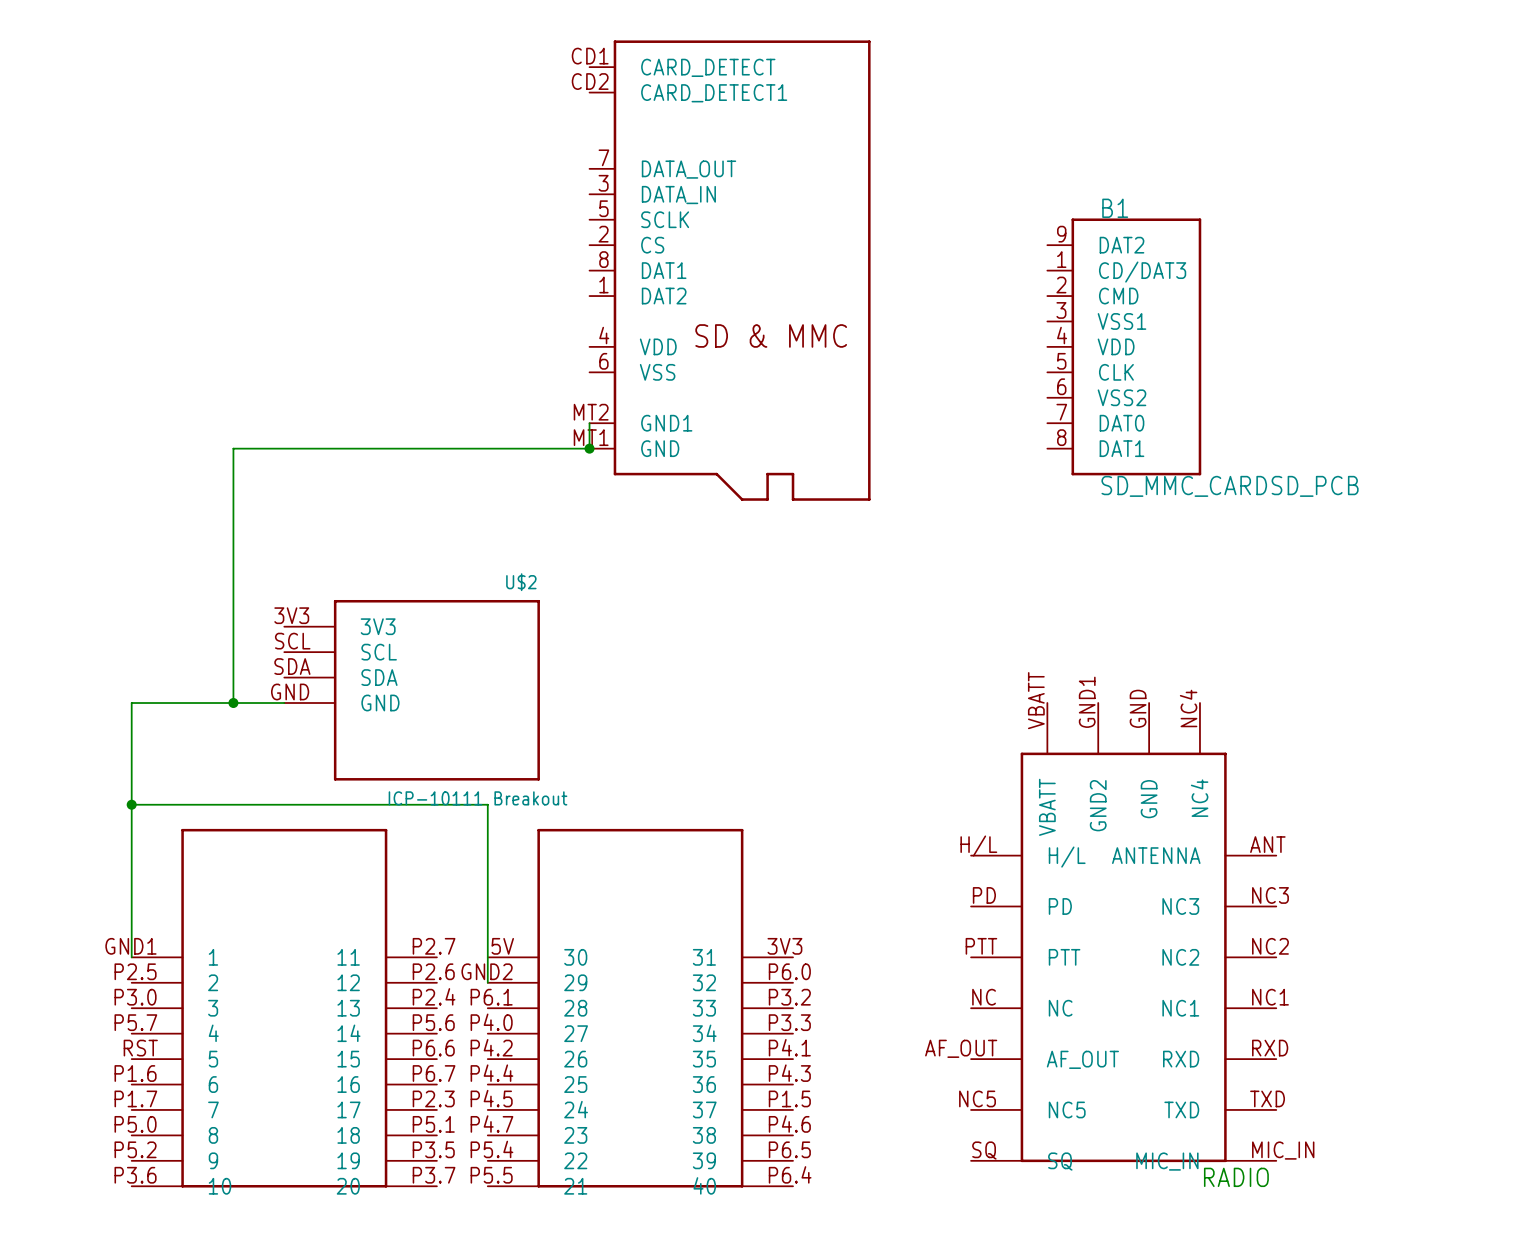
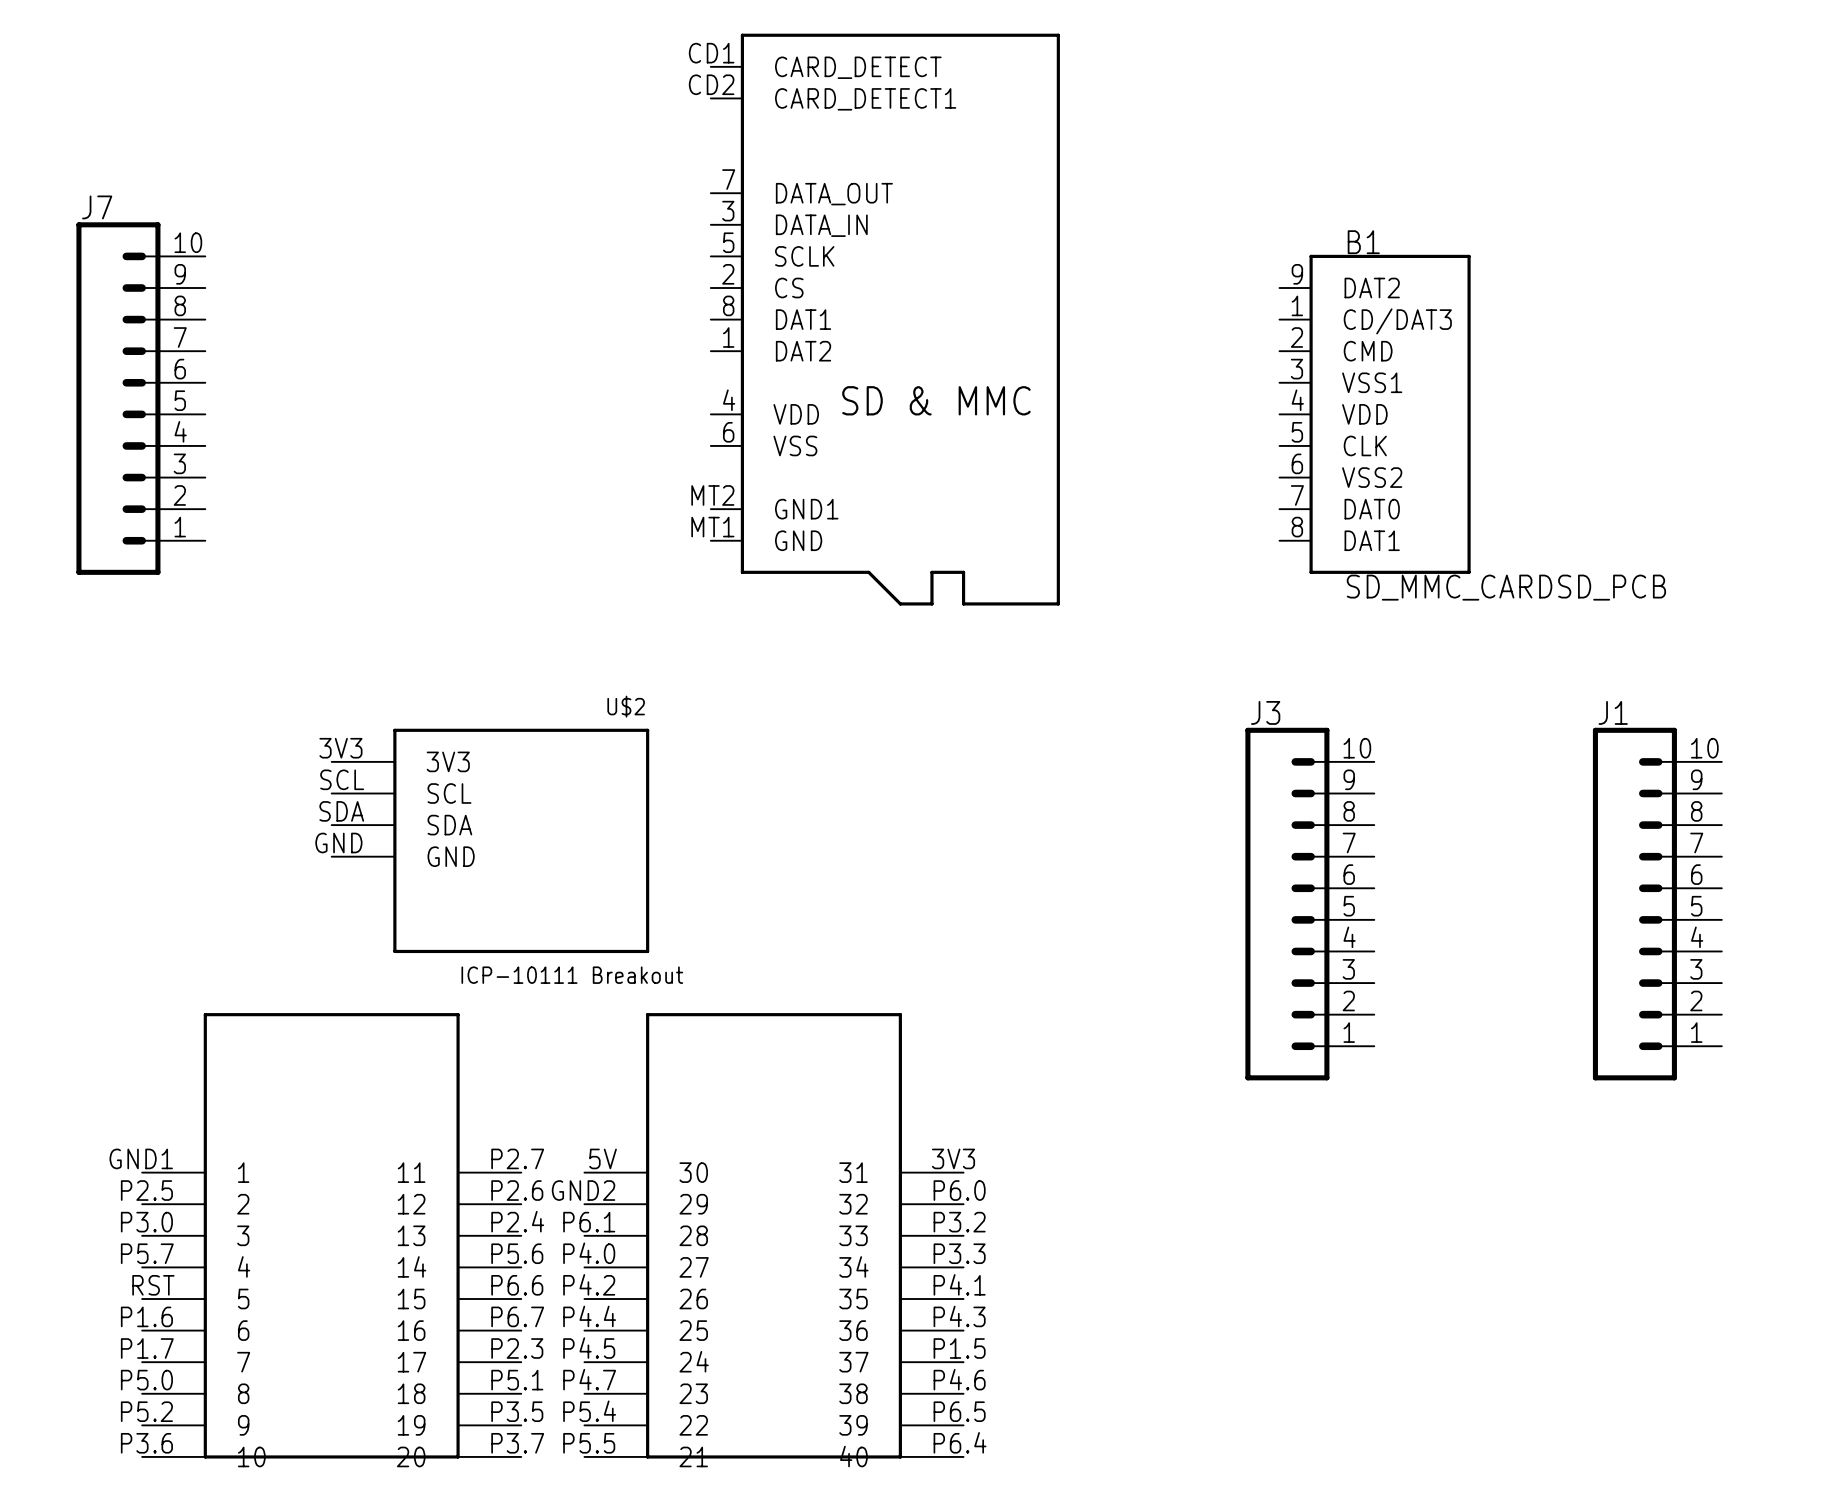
J7: none -> (140, 398)
wire: (589, 423) (589, 448) (233, 448) (233, 703) -> none
junction: (589, 448) -> none
junction: (233, 703) -> none
wire: (284, 703) (131, 703) (131, 957) -> none
J3: none -> (1309, 904)
J1: none -> (1657, 904)
wire: (131, 804) (487, 804) (487, 982) -> none
junction: (131, 804) -> none
part: (1123, 932) -> none
text: RADIO (1236, 1177) -> none

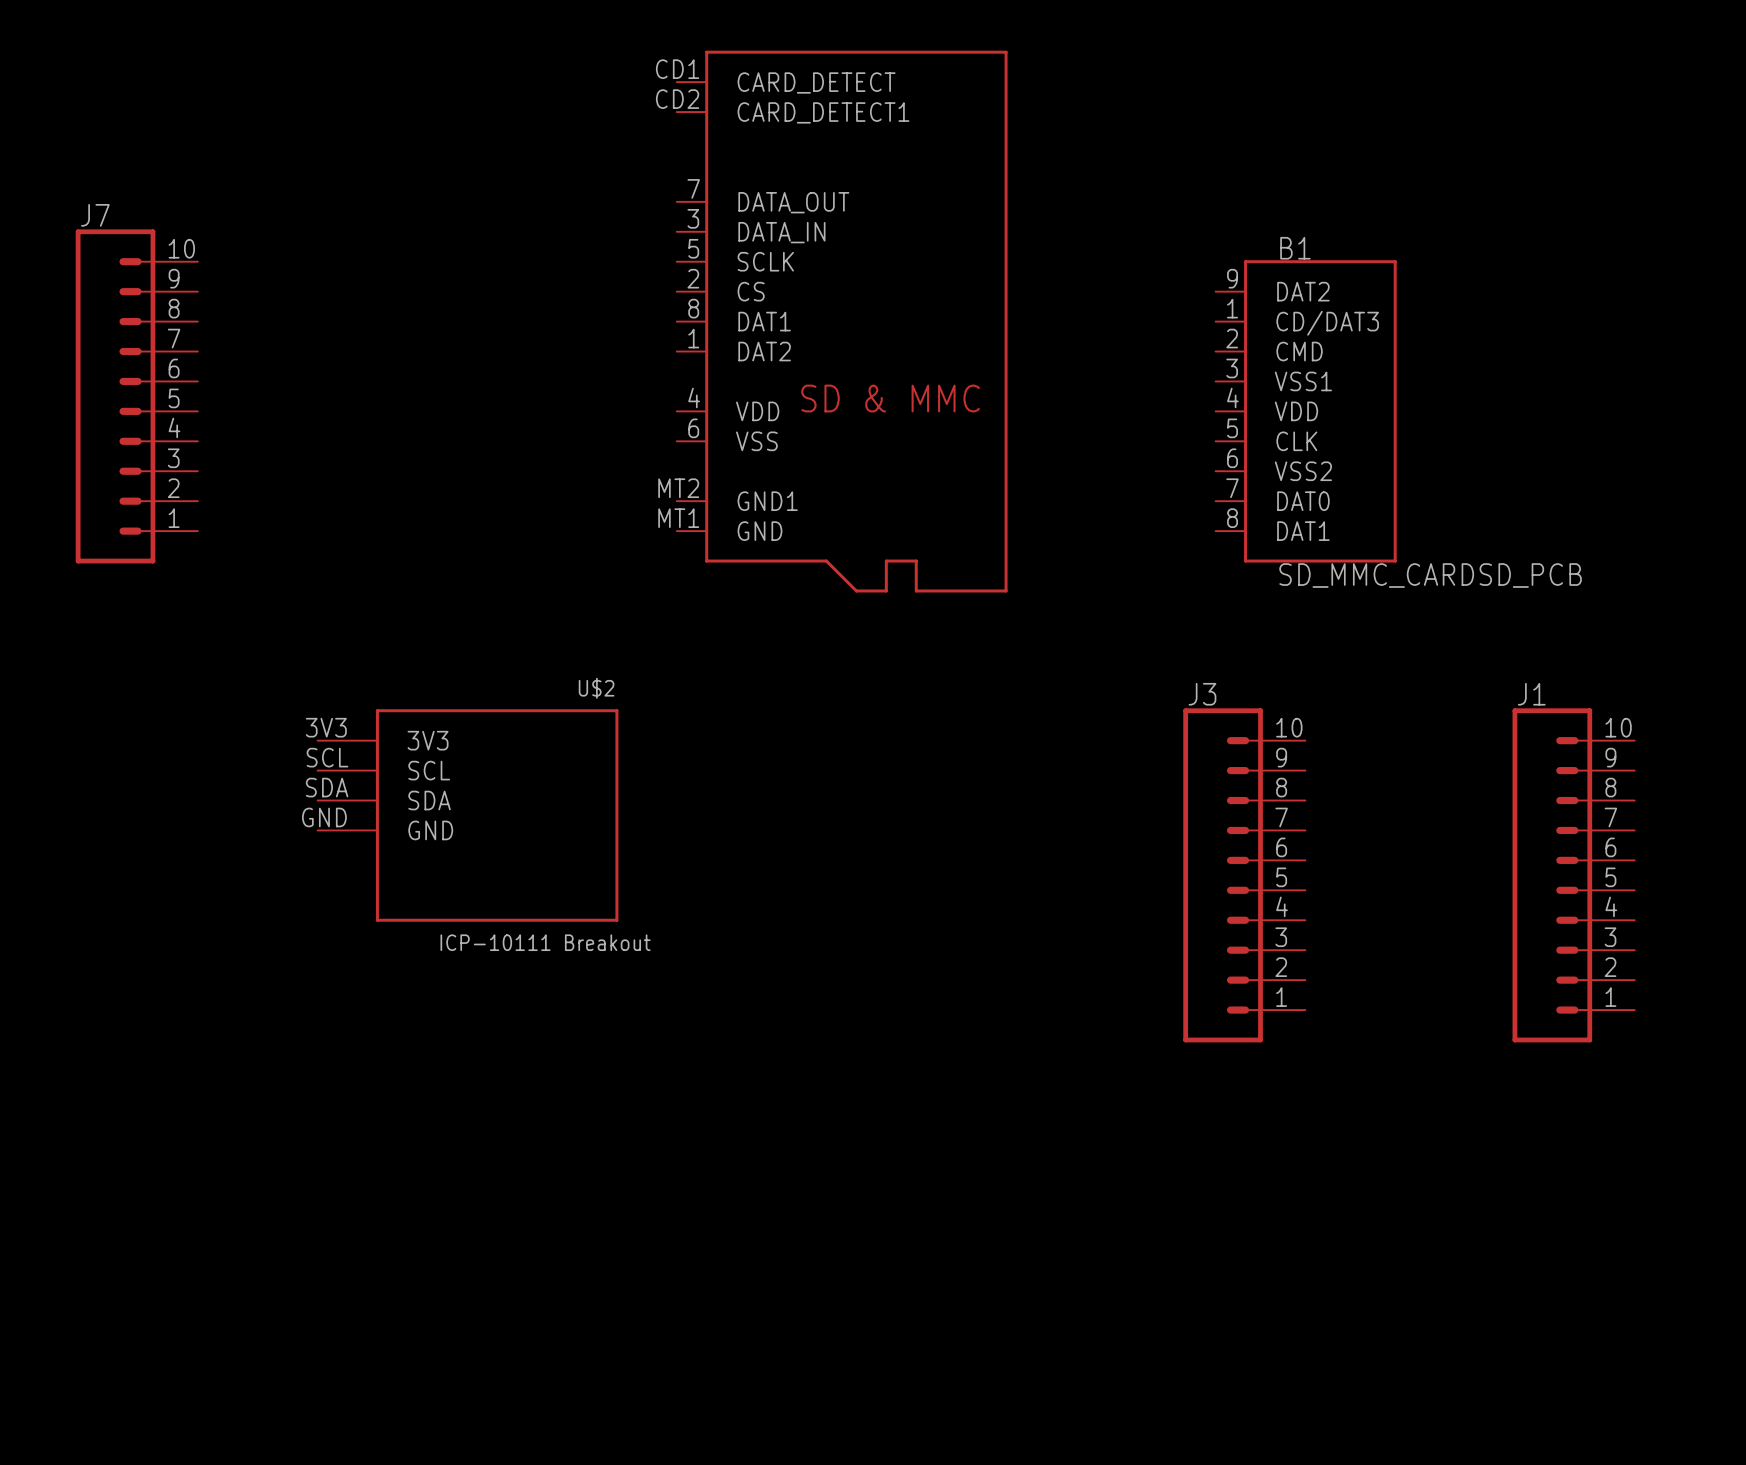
part: (552, 1235) -> none

